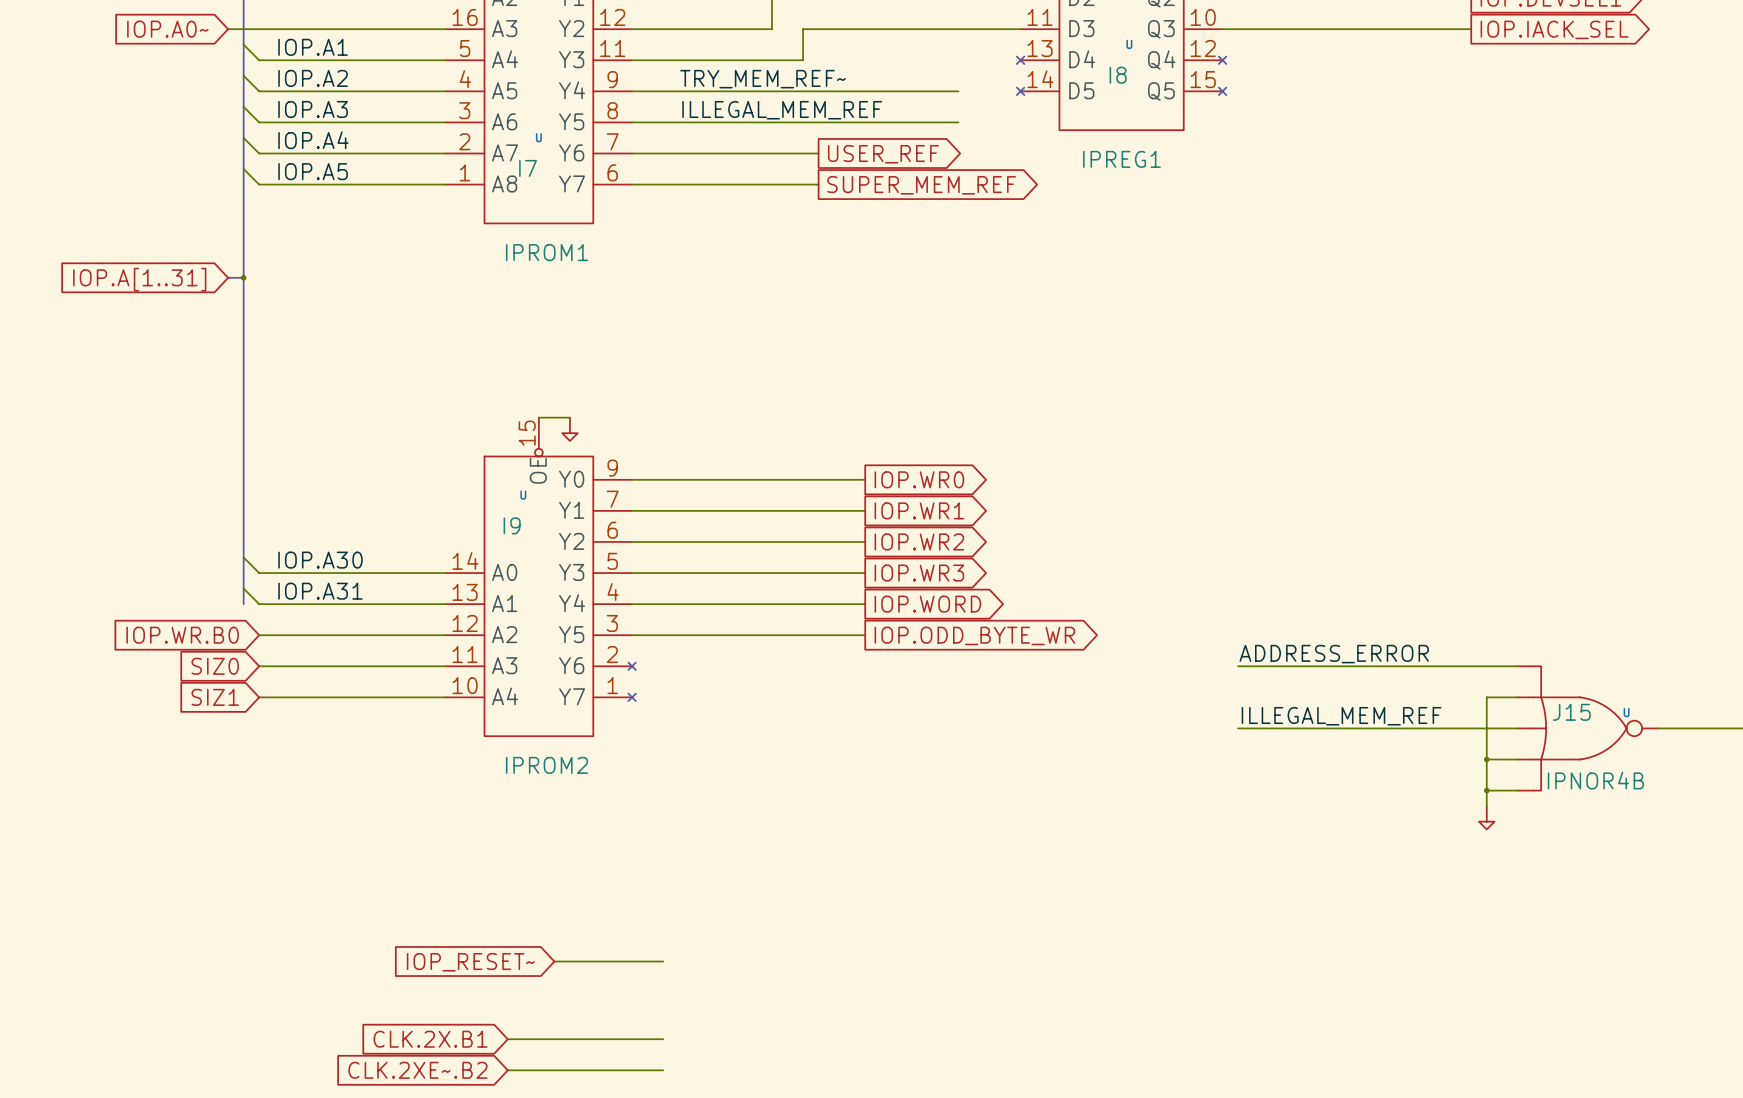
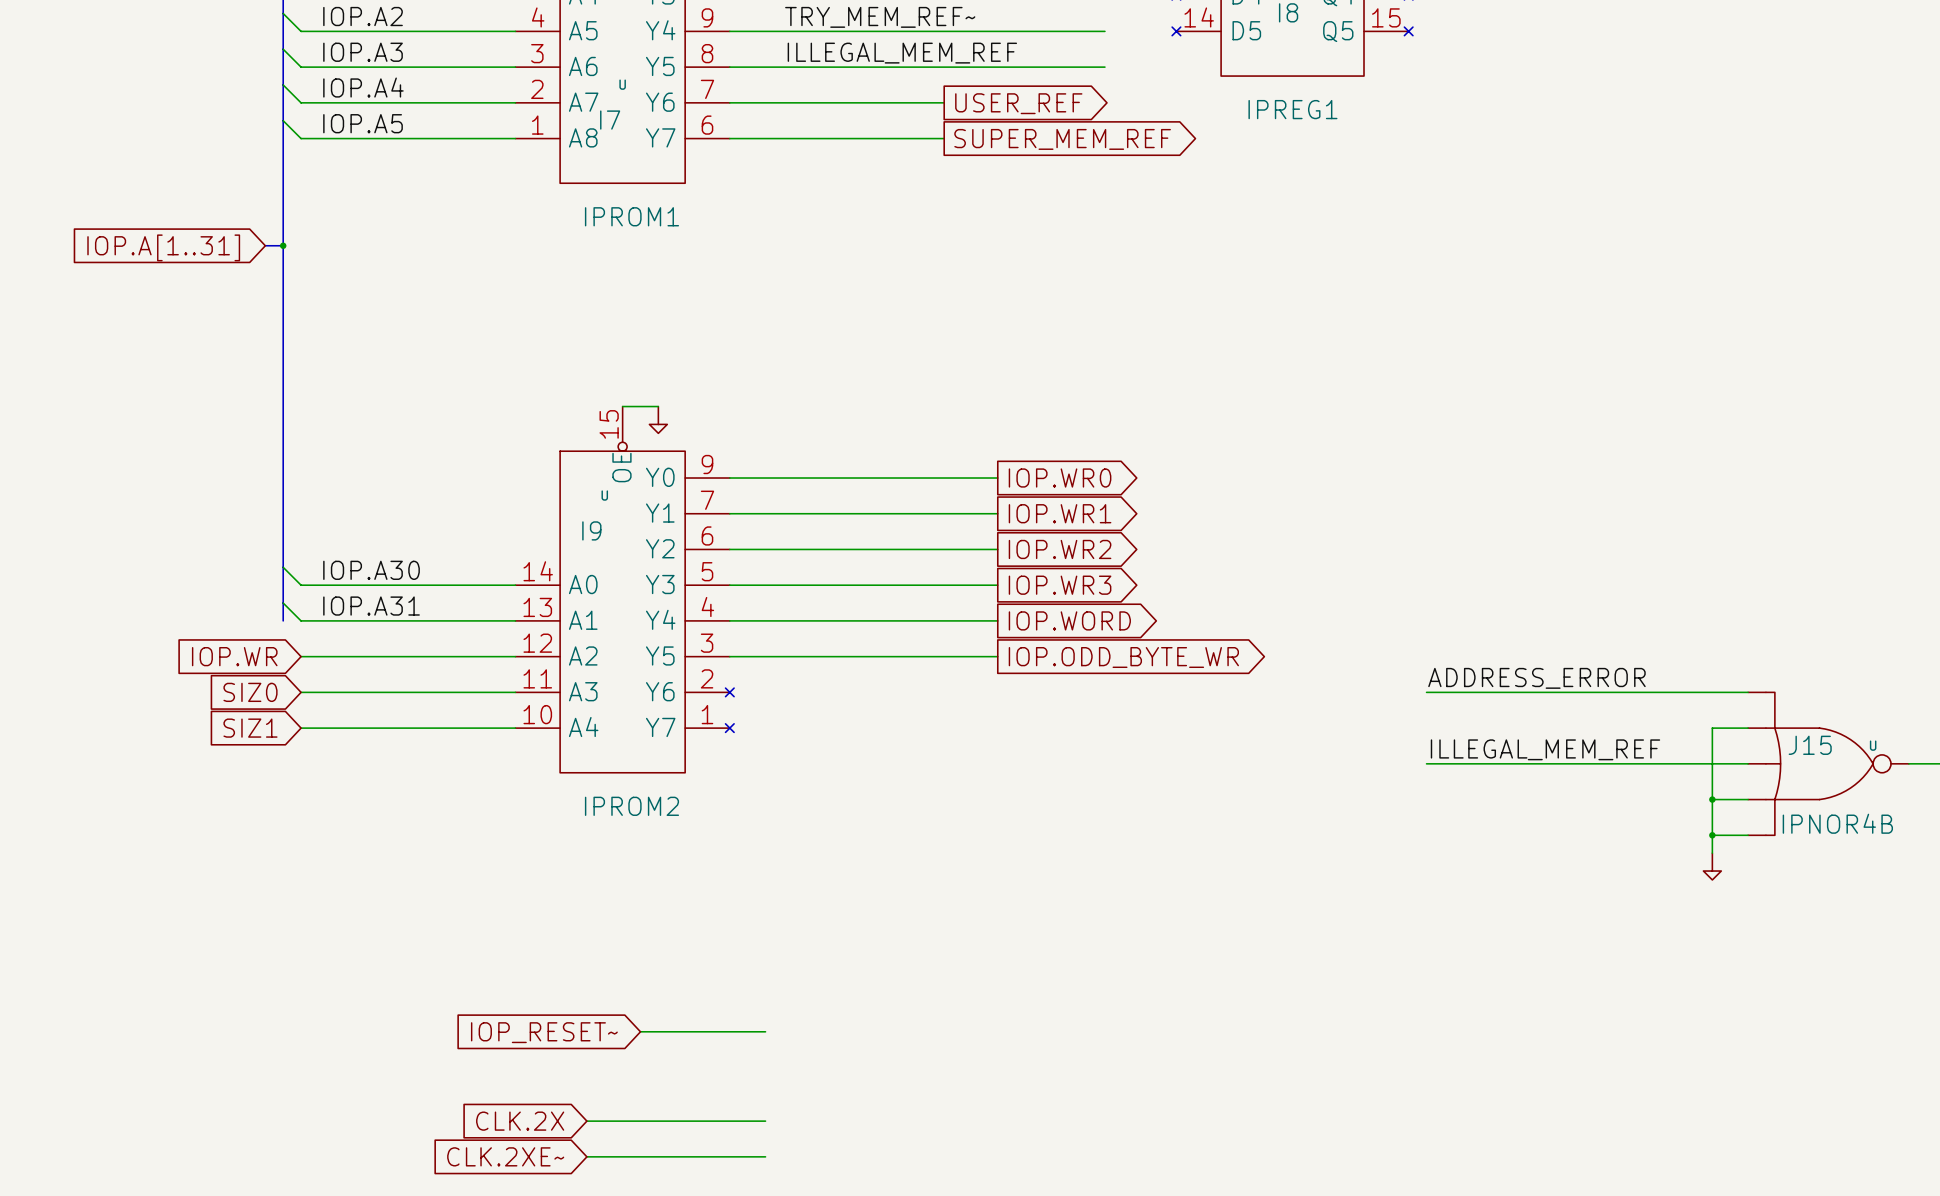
global label: IOP.WR.B0 (182, 635) -> IOP.WR (234, 656)
global label: CLK.2X.B1 (430, 1039) -> CLK.2X (520, 1121)
global label: CLK.2XE~.B2 (417, 1070) -> CLK.2XE~ (505, 1156)

